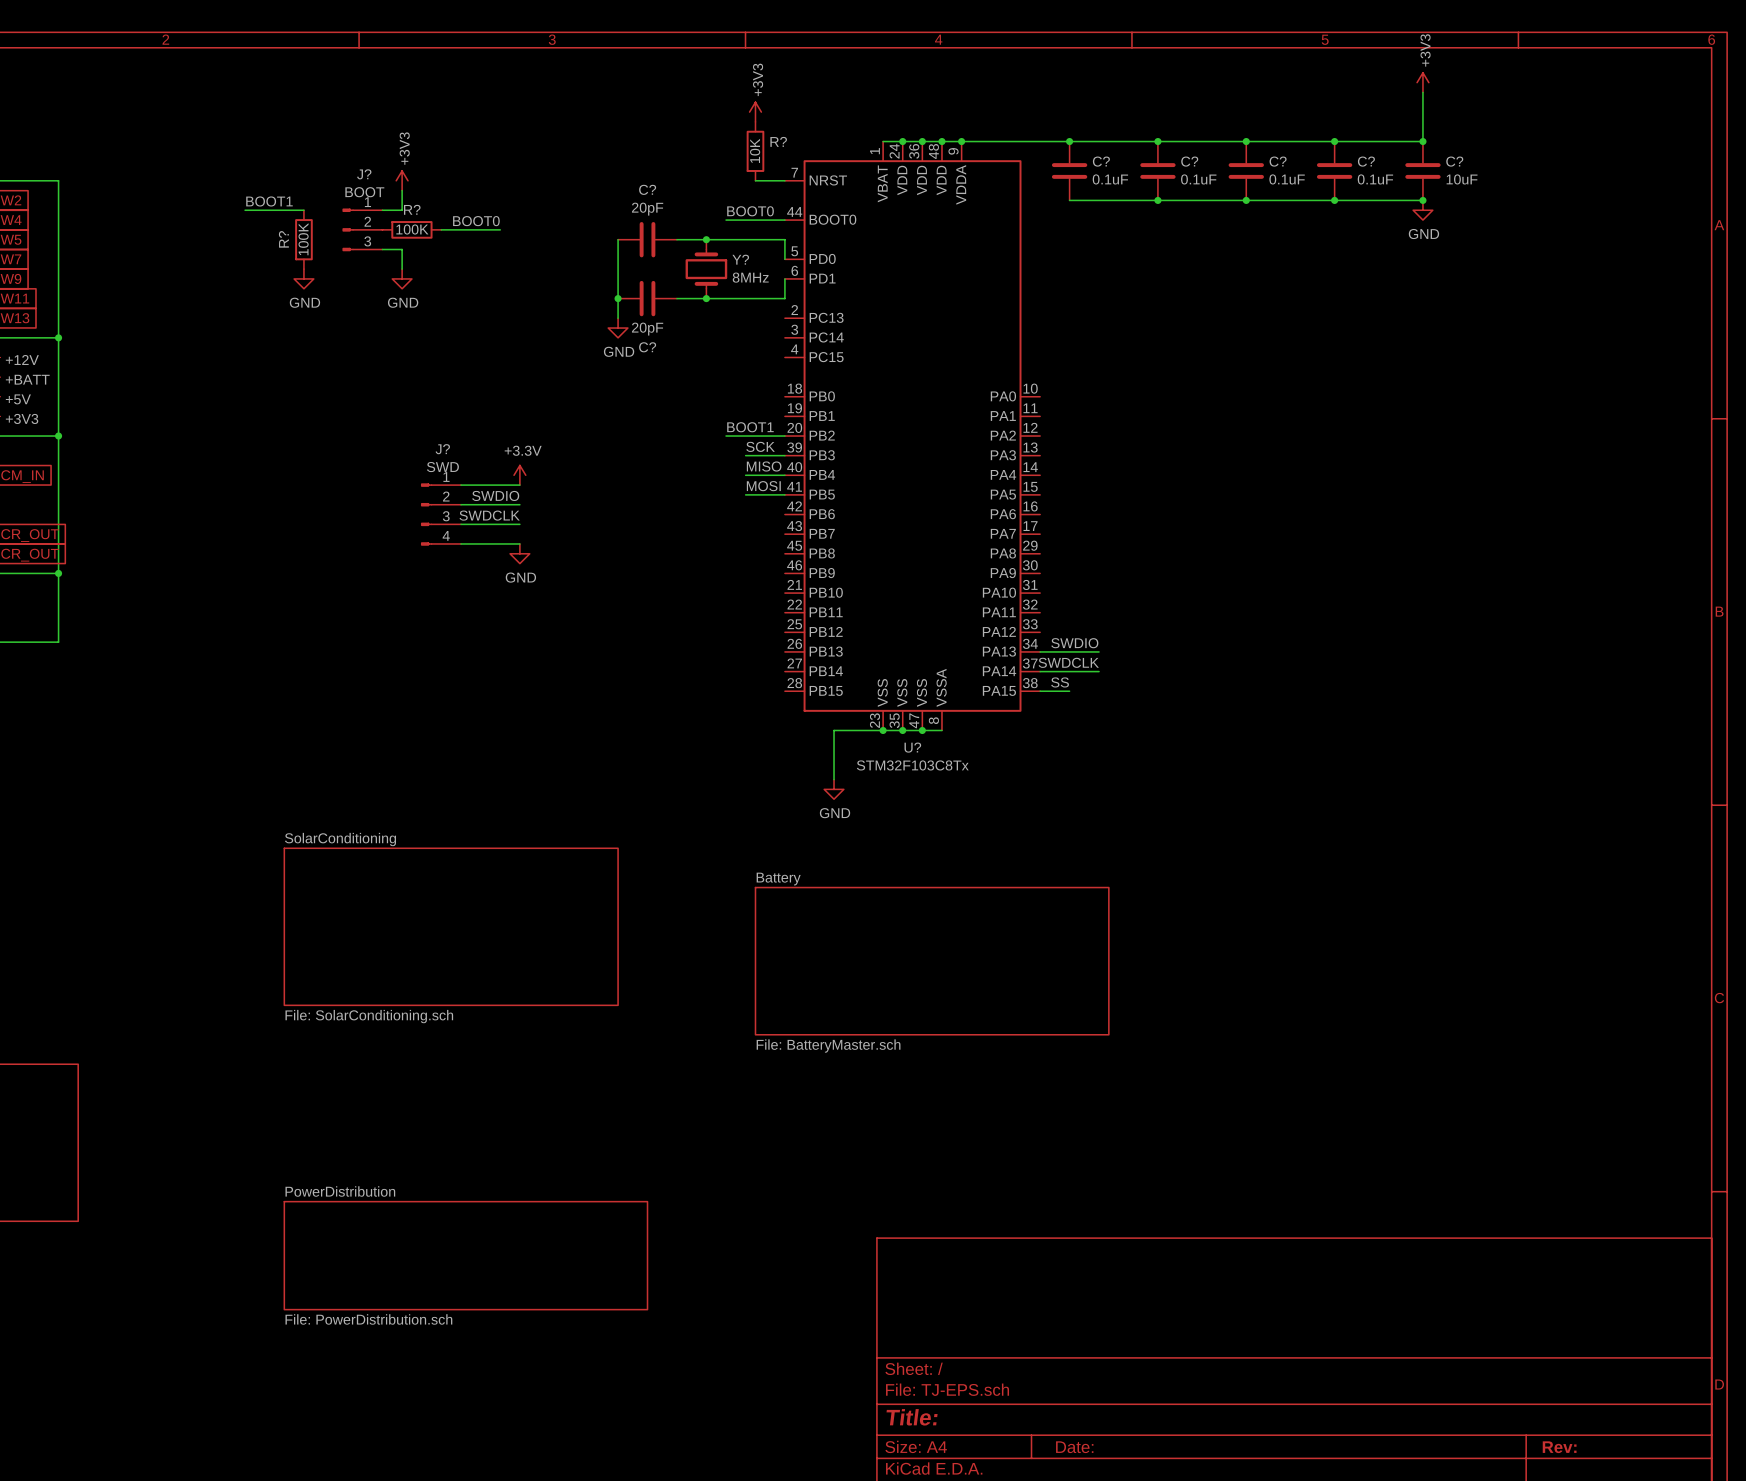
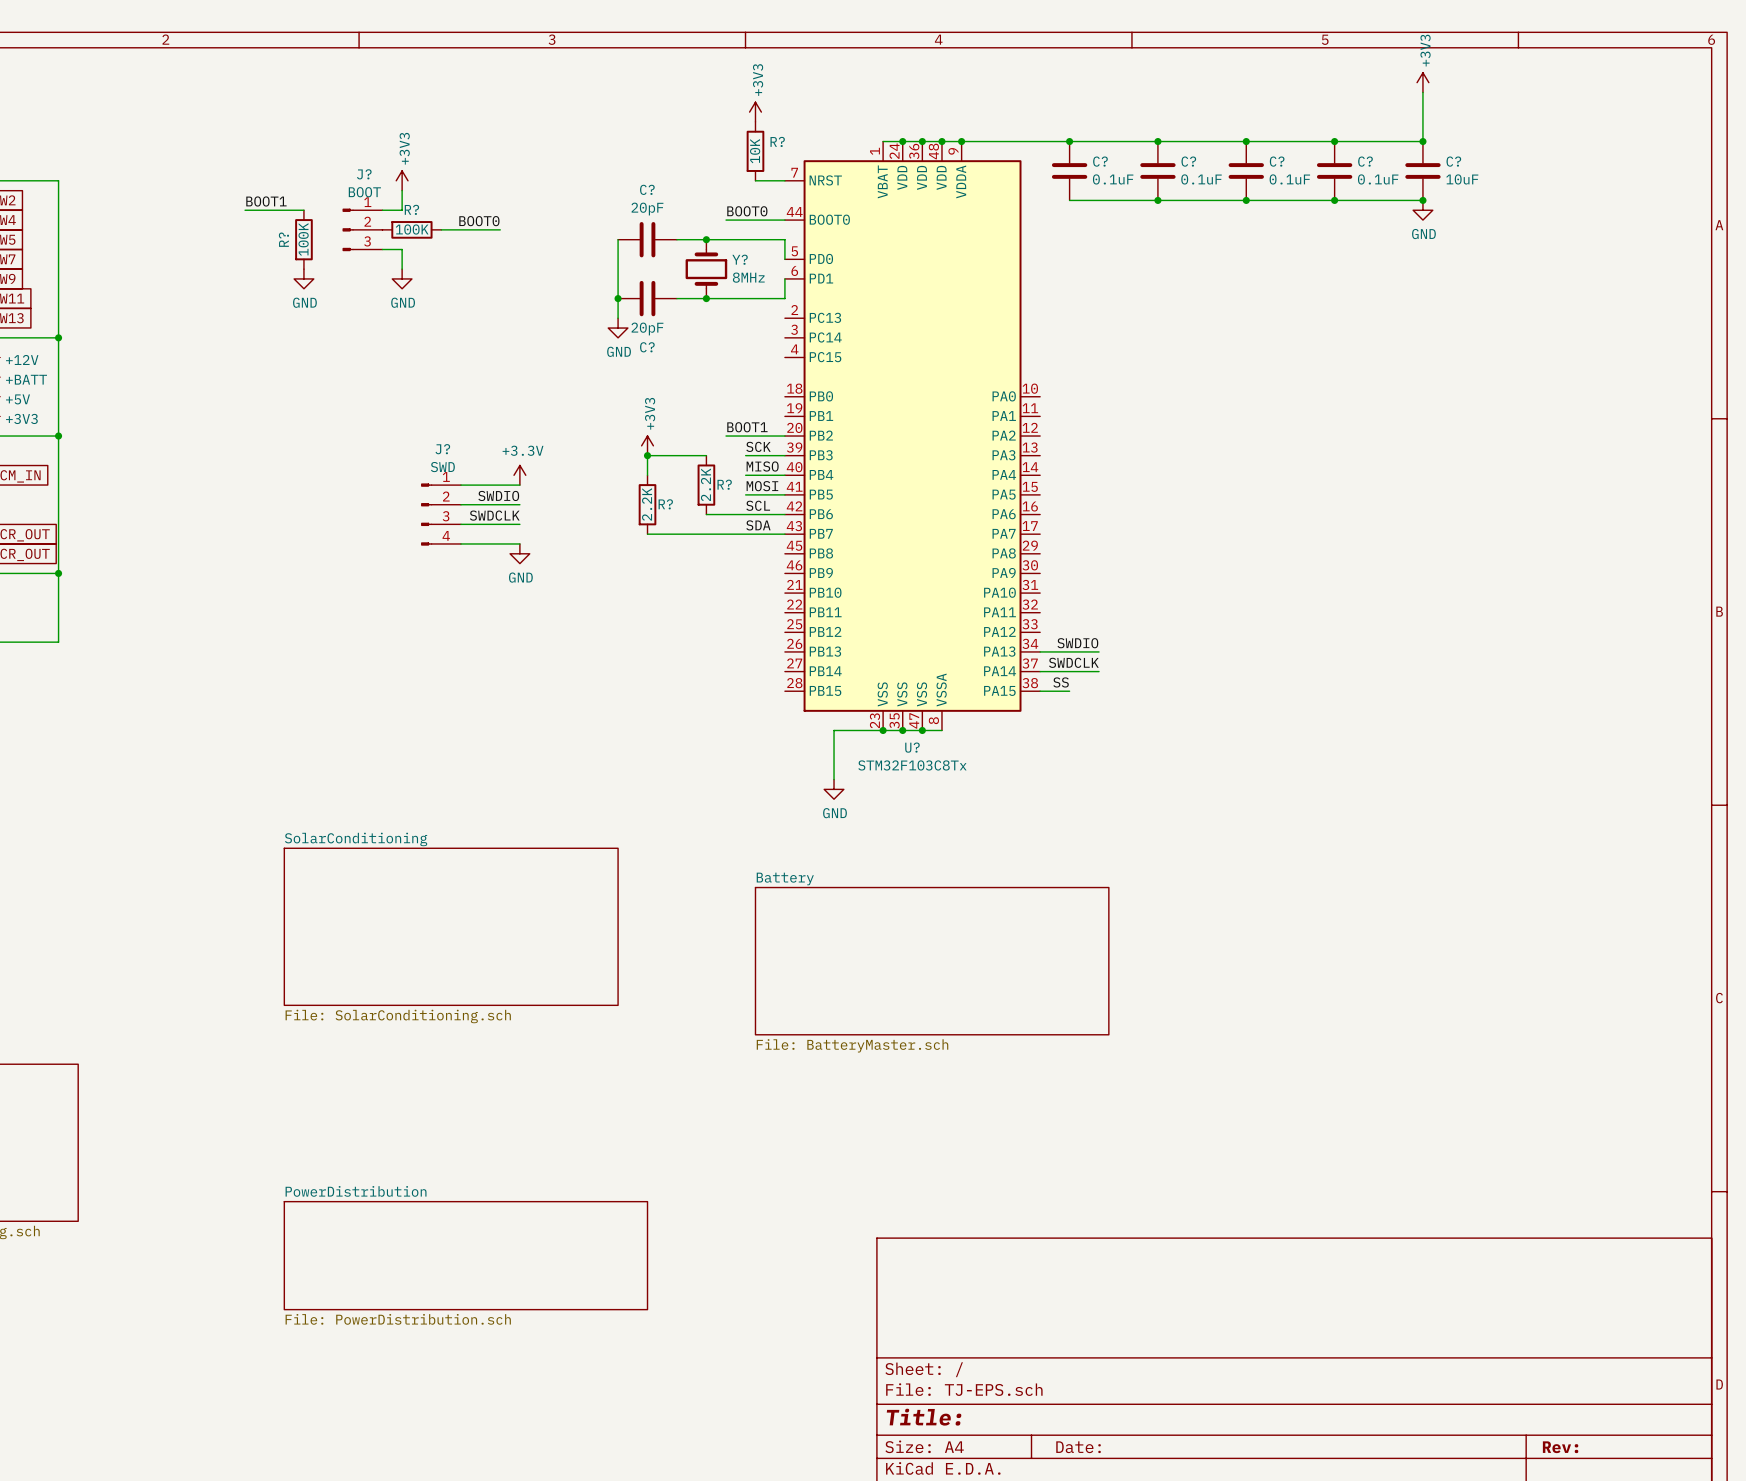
power symbol: none -> +3V3 (647, 445)
junction: none -> (647, 455)
wire: none -> (706, 455) (647, 455) (647, 475)
R?: none -> 2.2K (706, 485)
R?: none -> 2.2K (647, 504)
label: none -> SCL (758, 505)
wire: none -> (706, 514) (784, 514)
label: none -> SDA (758, 525)
wire: none -> (647, 534) (784, 534)

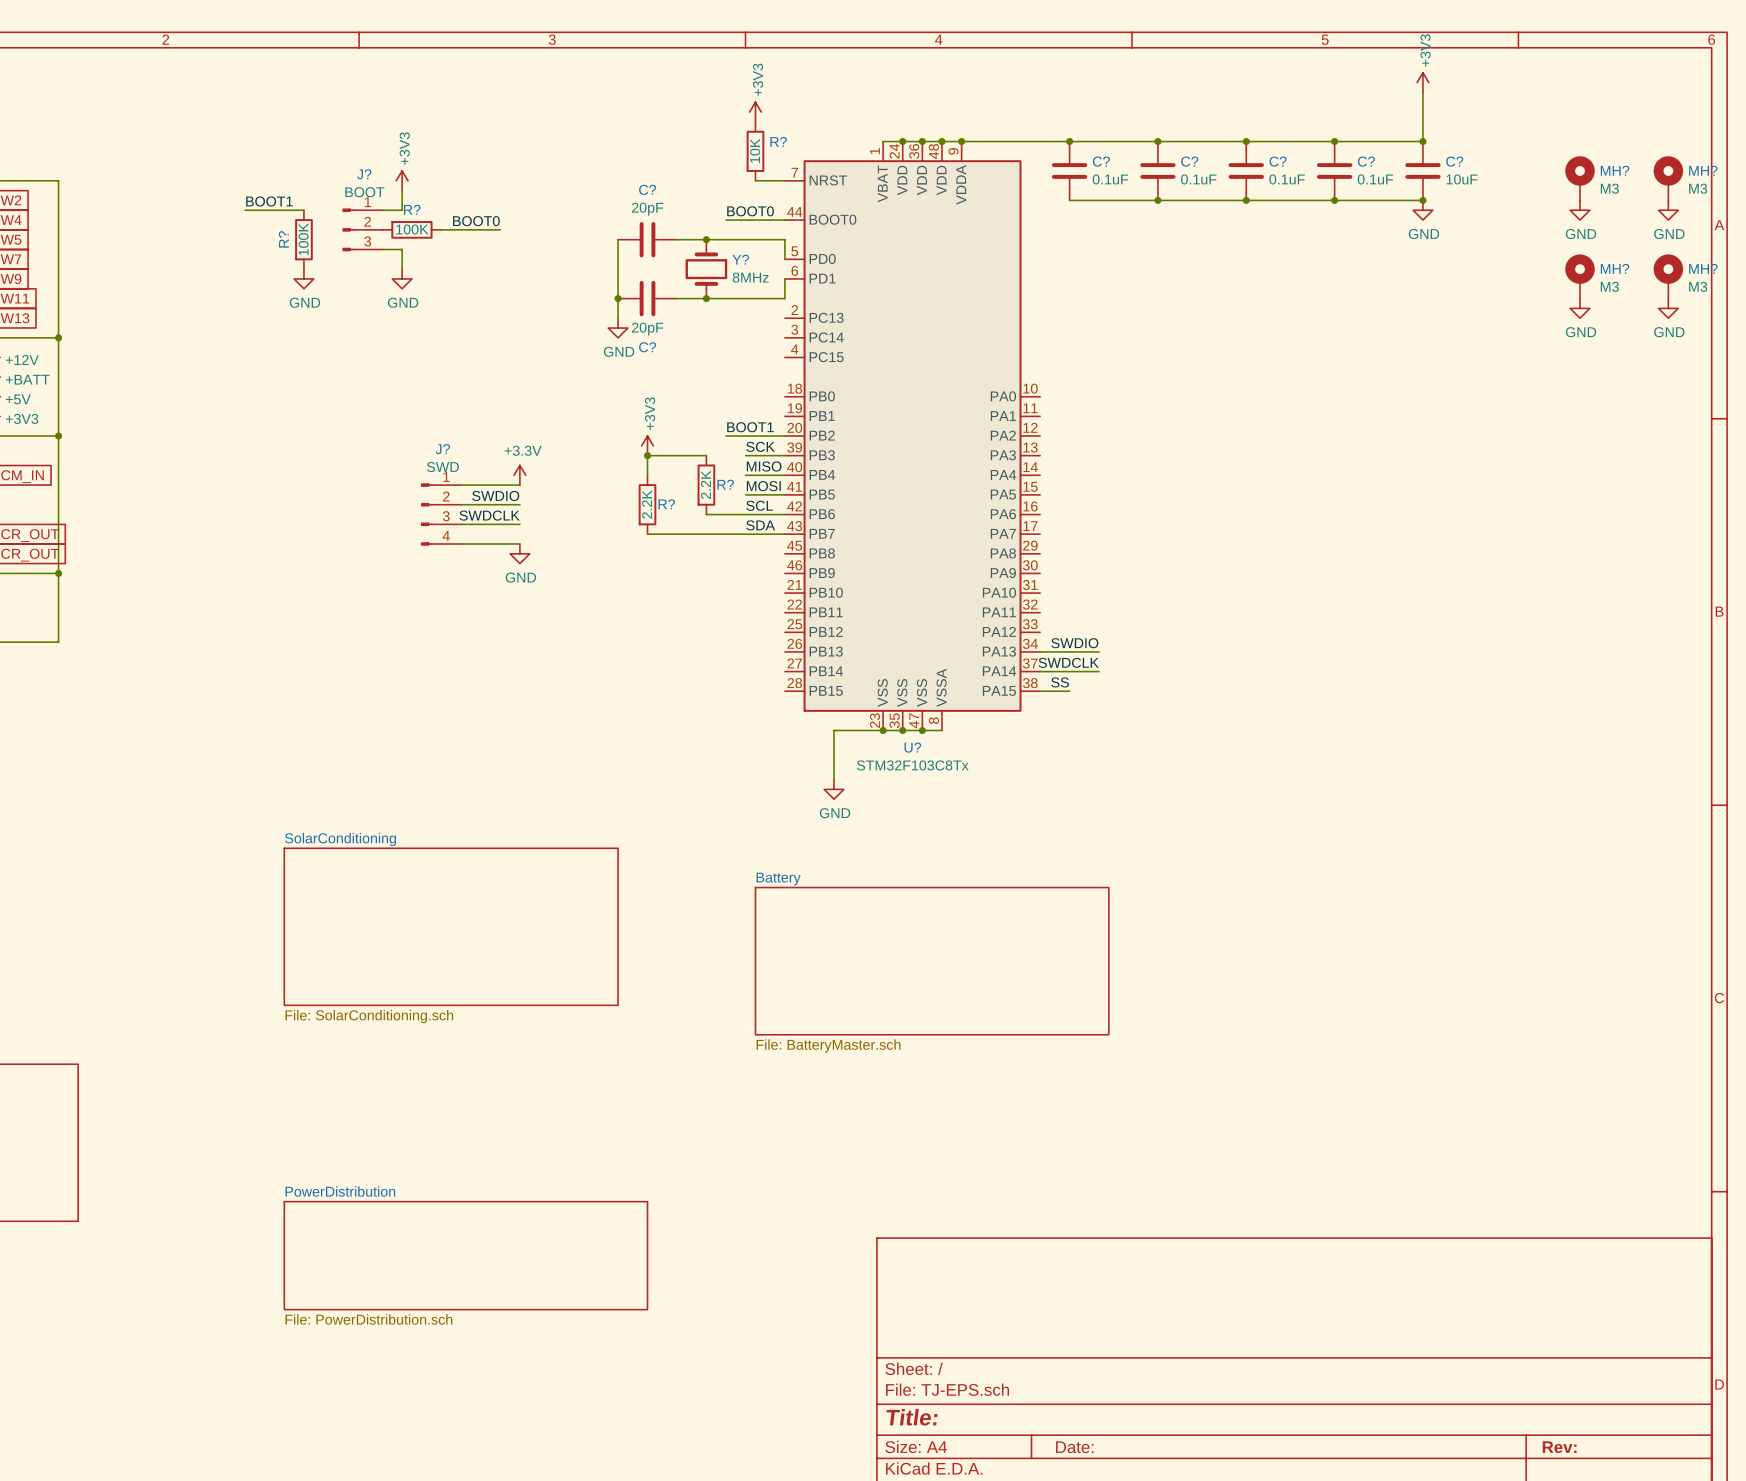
MH?: none -> M3 (1580, 178)
MH?: none -> M3 (1668, 178)
power symbol: none -> GND (1580, 210)
power symbol: none -> GND (1668, 210)
MH?: none -> M3 (1580, 276)
MH?: none -> M3 (1668, 276)
power symbol: none -> GND (1580, 308)
power symbol: none -> GND (1668, 308)

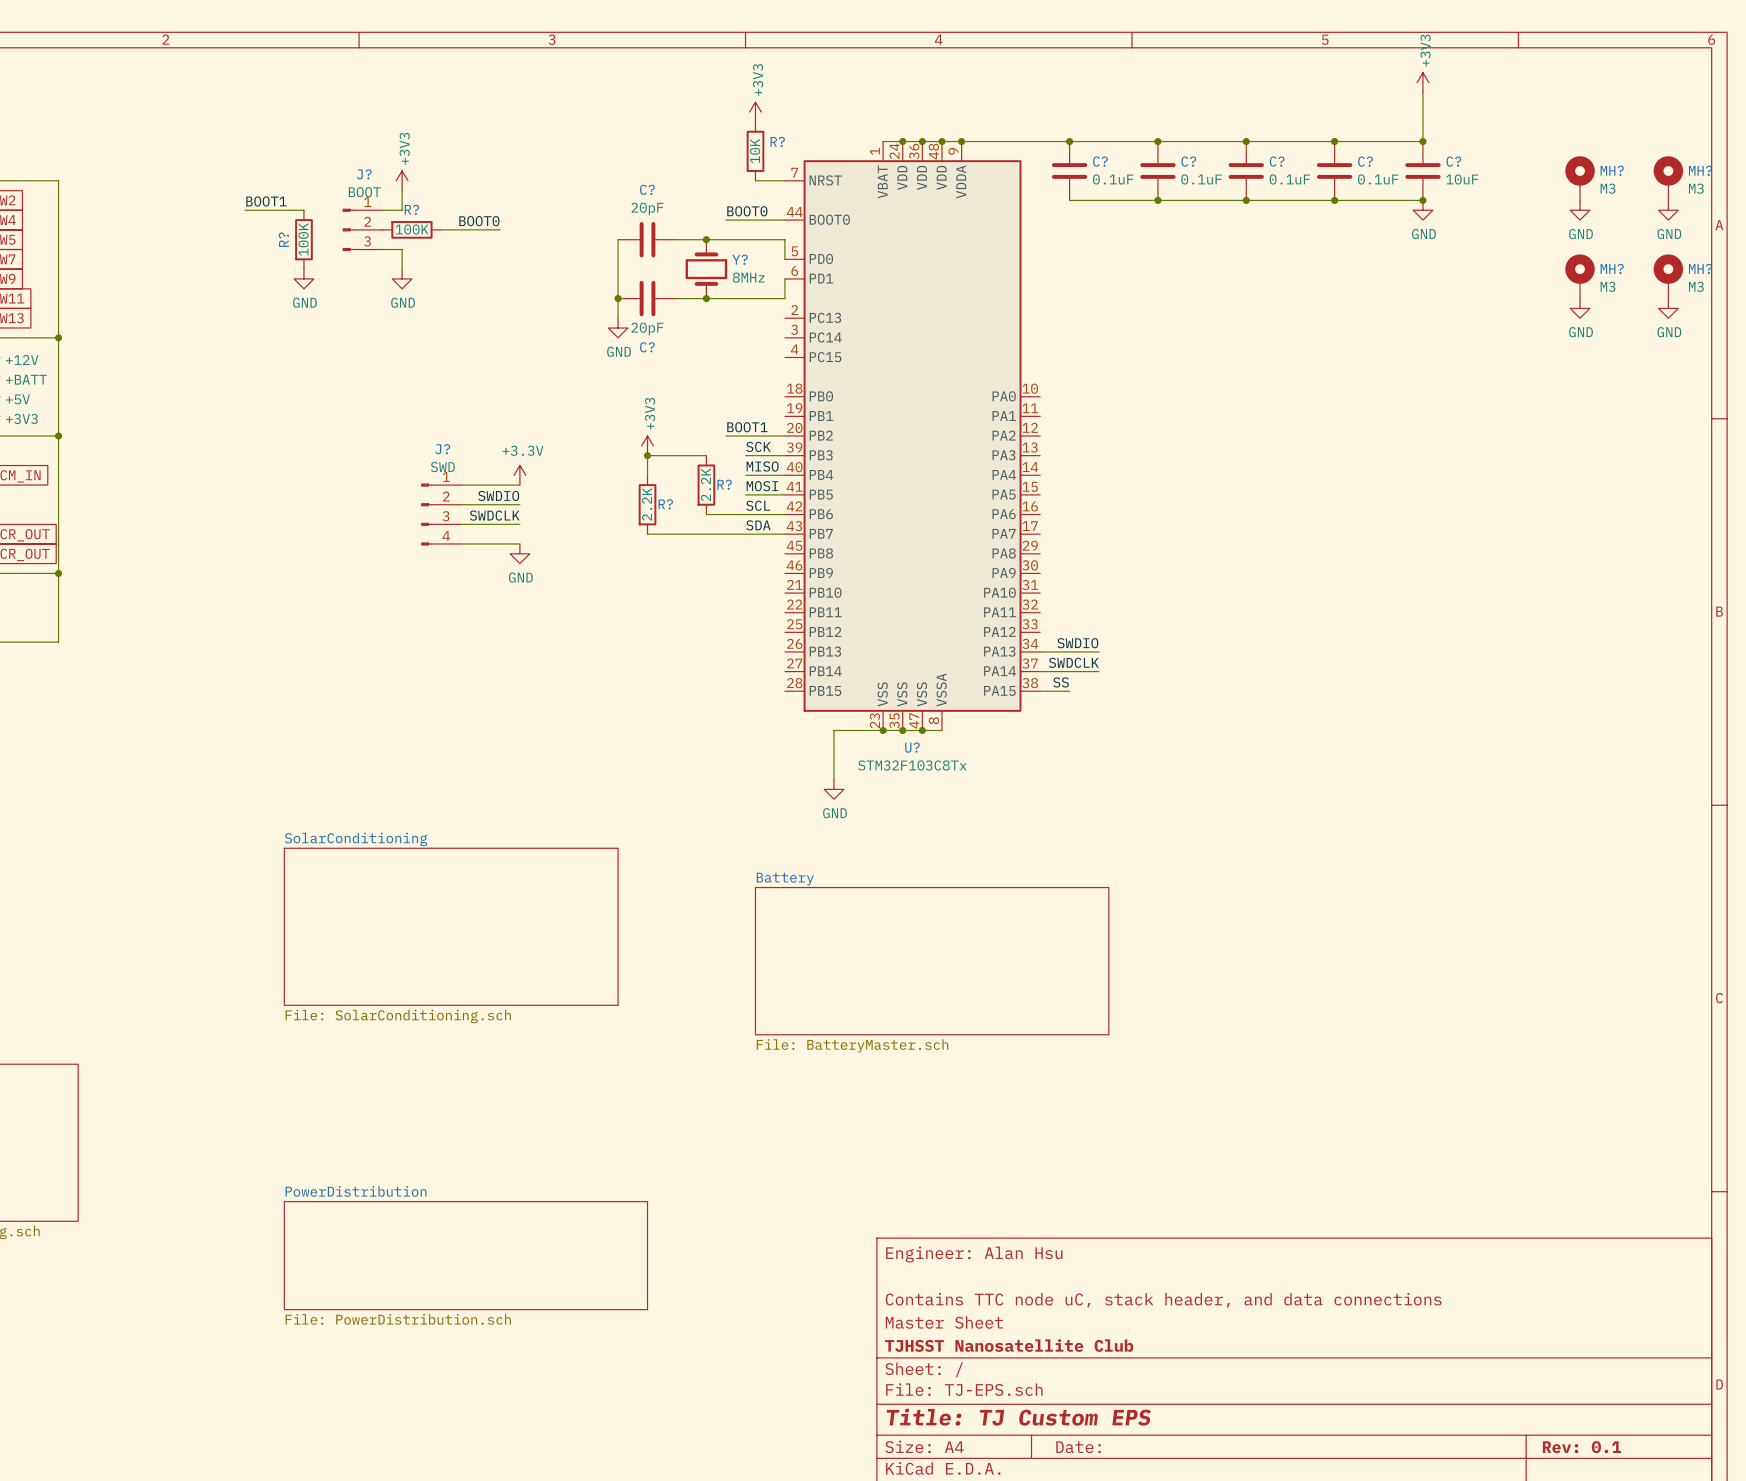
title block: none -> Engineer: Alan Hsu (974, 1254)
title block: none -> Contains TTC node uC, stack header, and data connections (1163, 1300)
title block: none -> Master Sheet (944, 1322)
title block: none -> TJHSST Nanosatellite Club (1009, 1345)
title block: Title: (912, 1417) -> Title: TJ Custom EPS (1018, 1417)
title block: Rev: (1559, 1447) -> Rev: 0.1 (1581, 1447)

